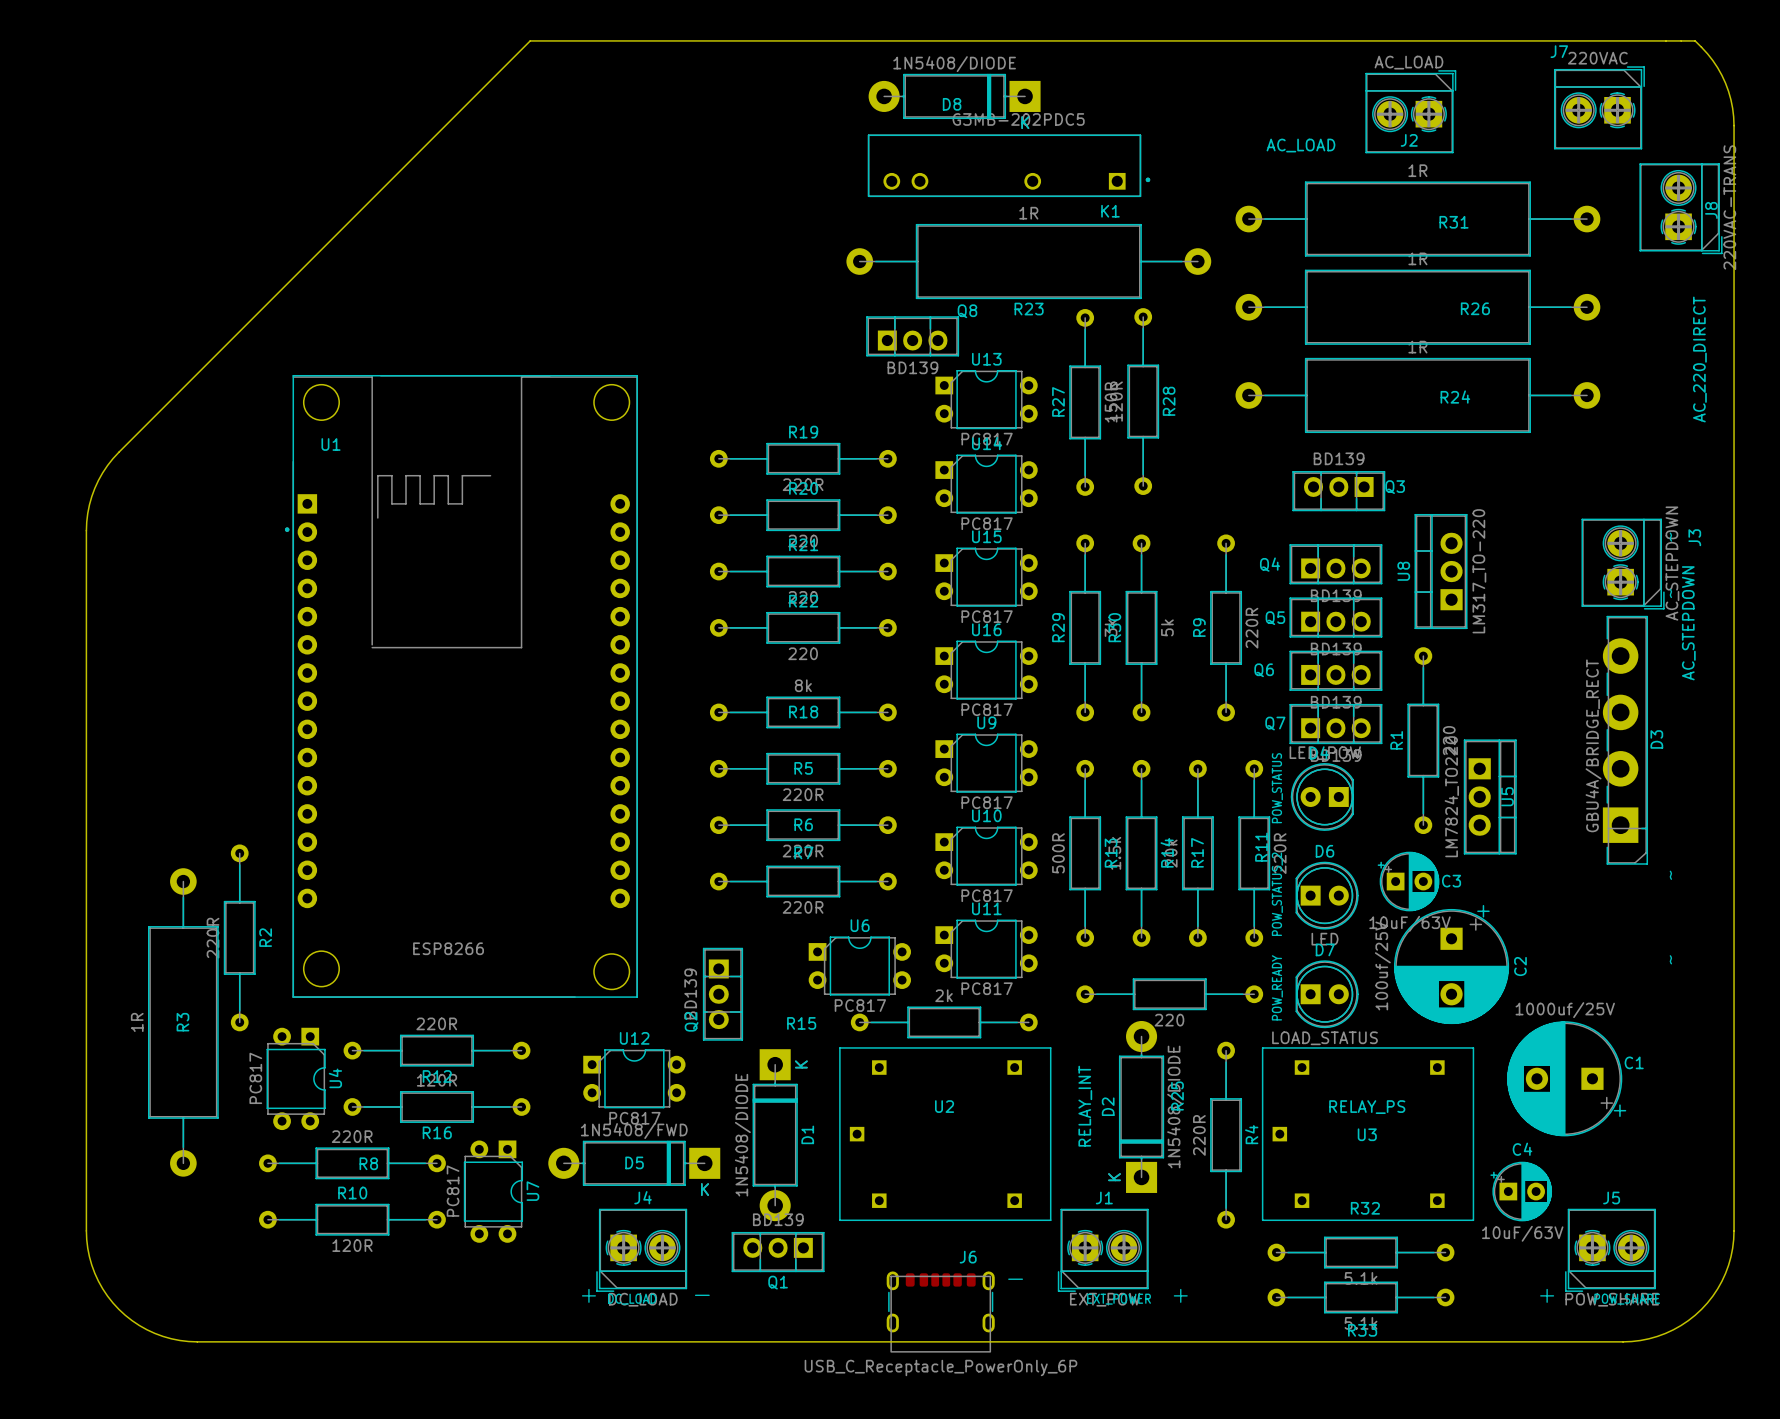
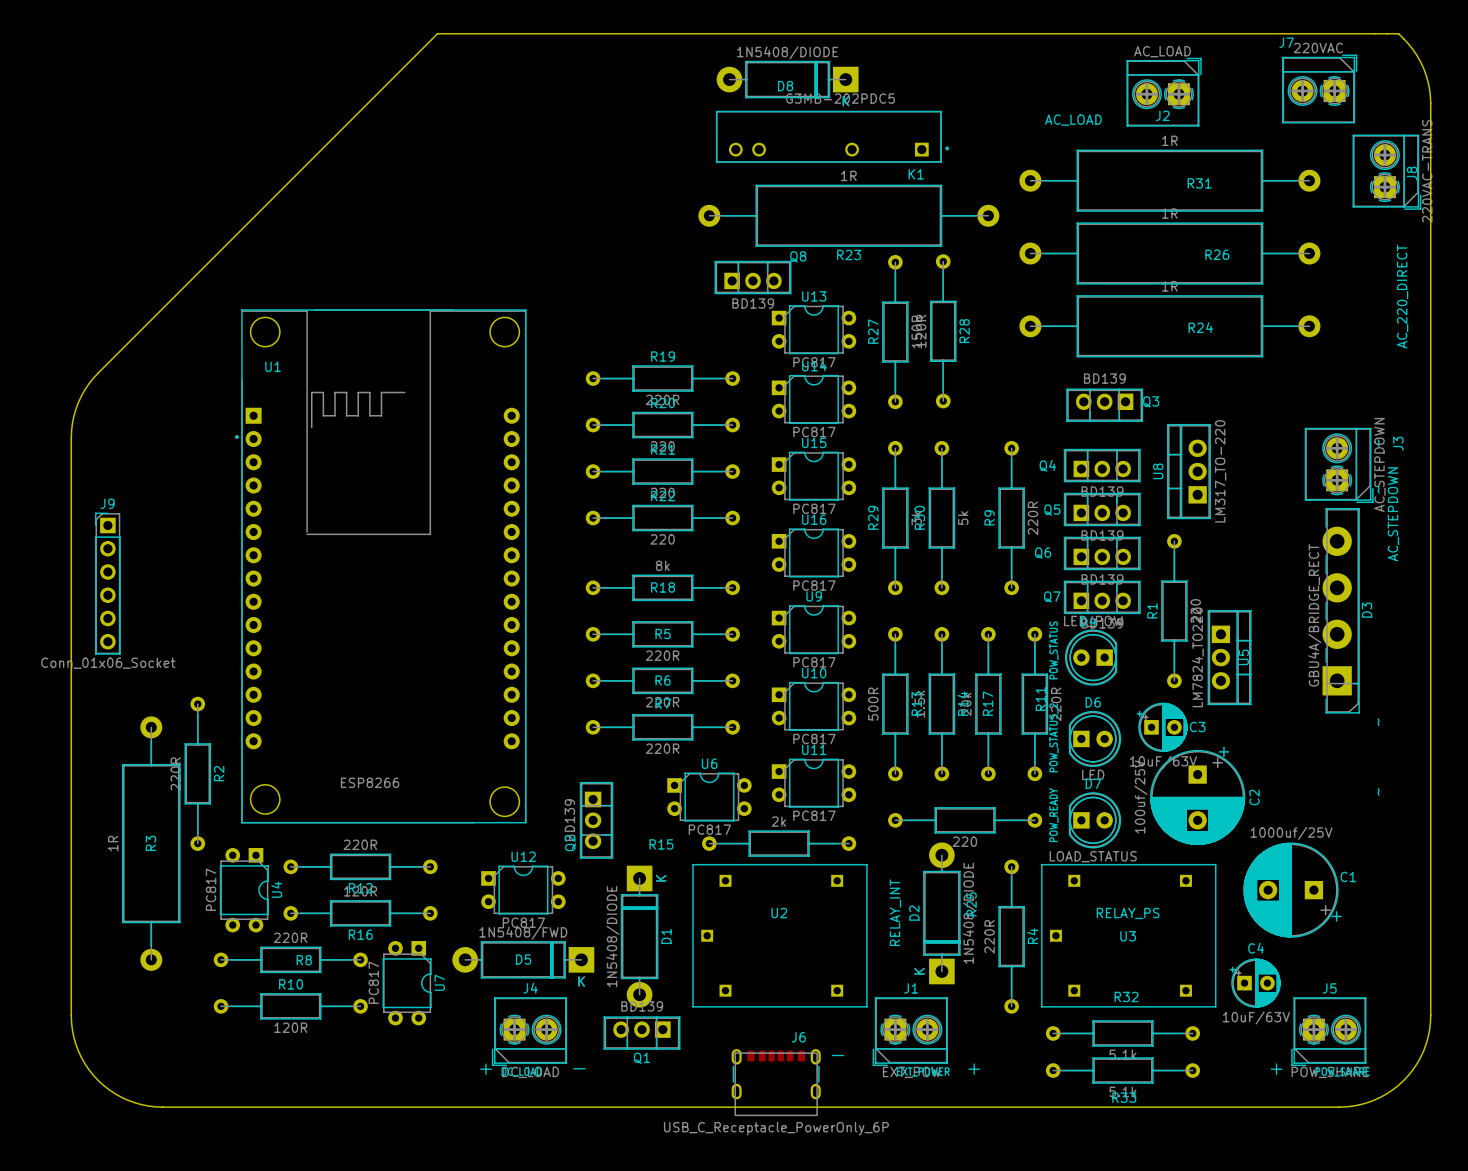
J9: none -> Conn_01x06_Socket (107, 583)

